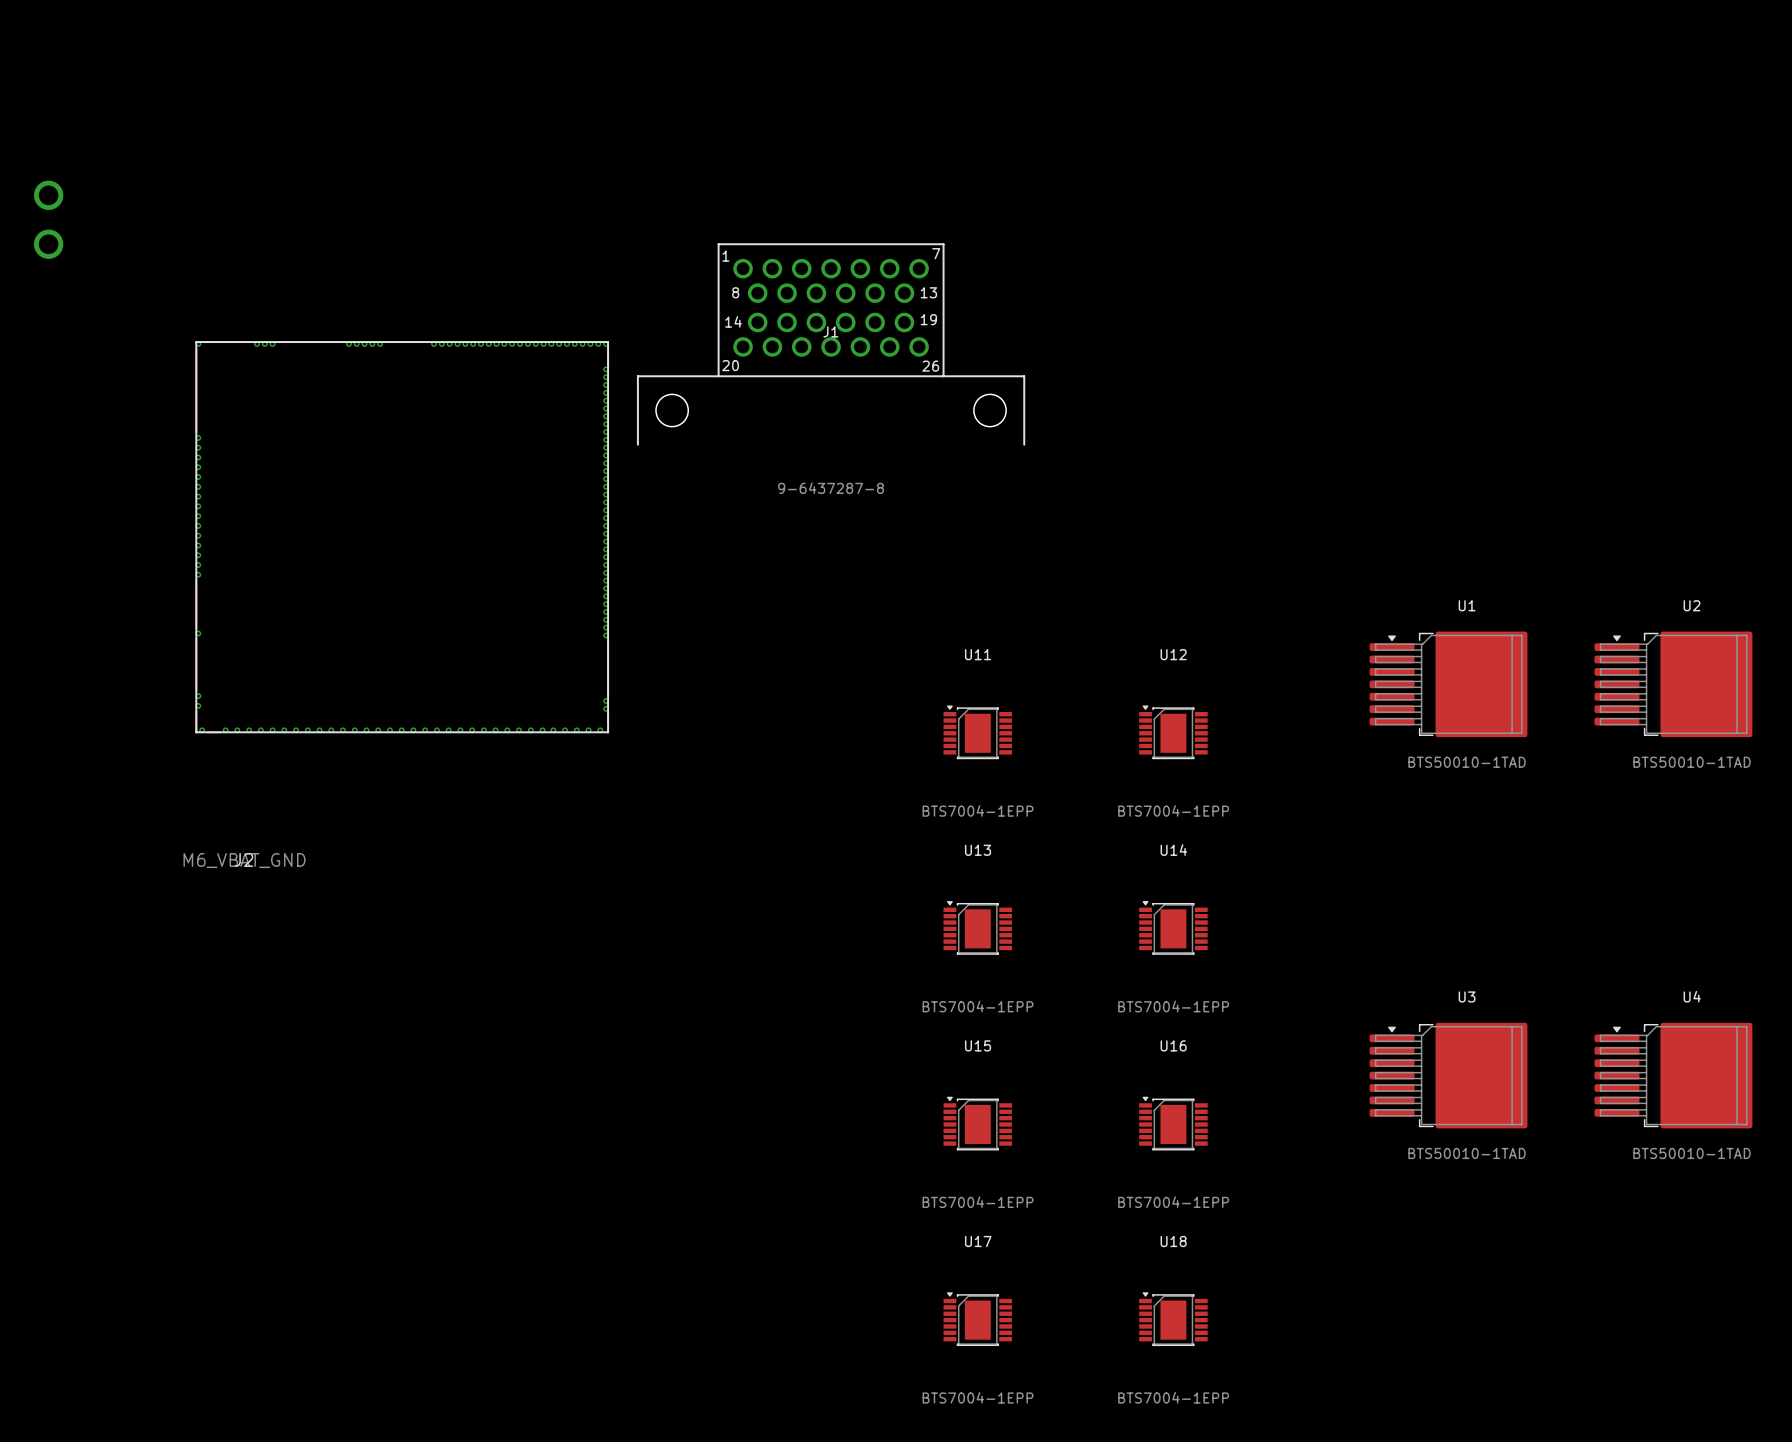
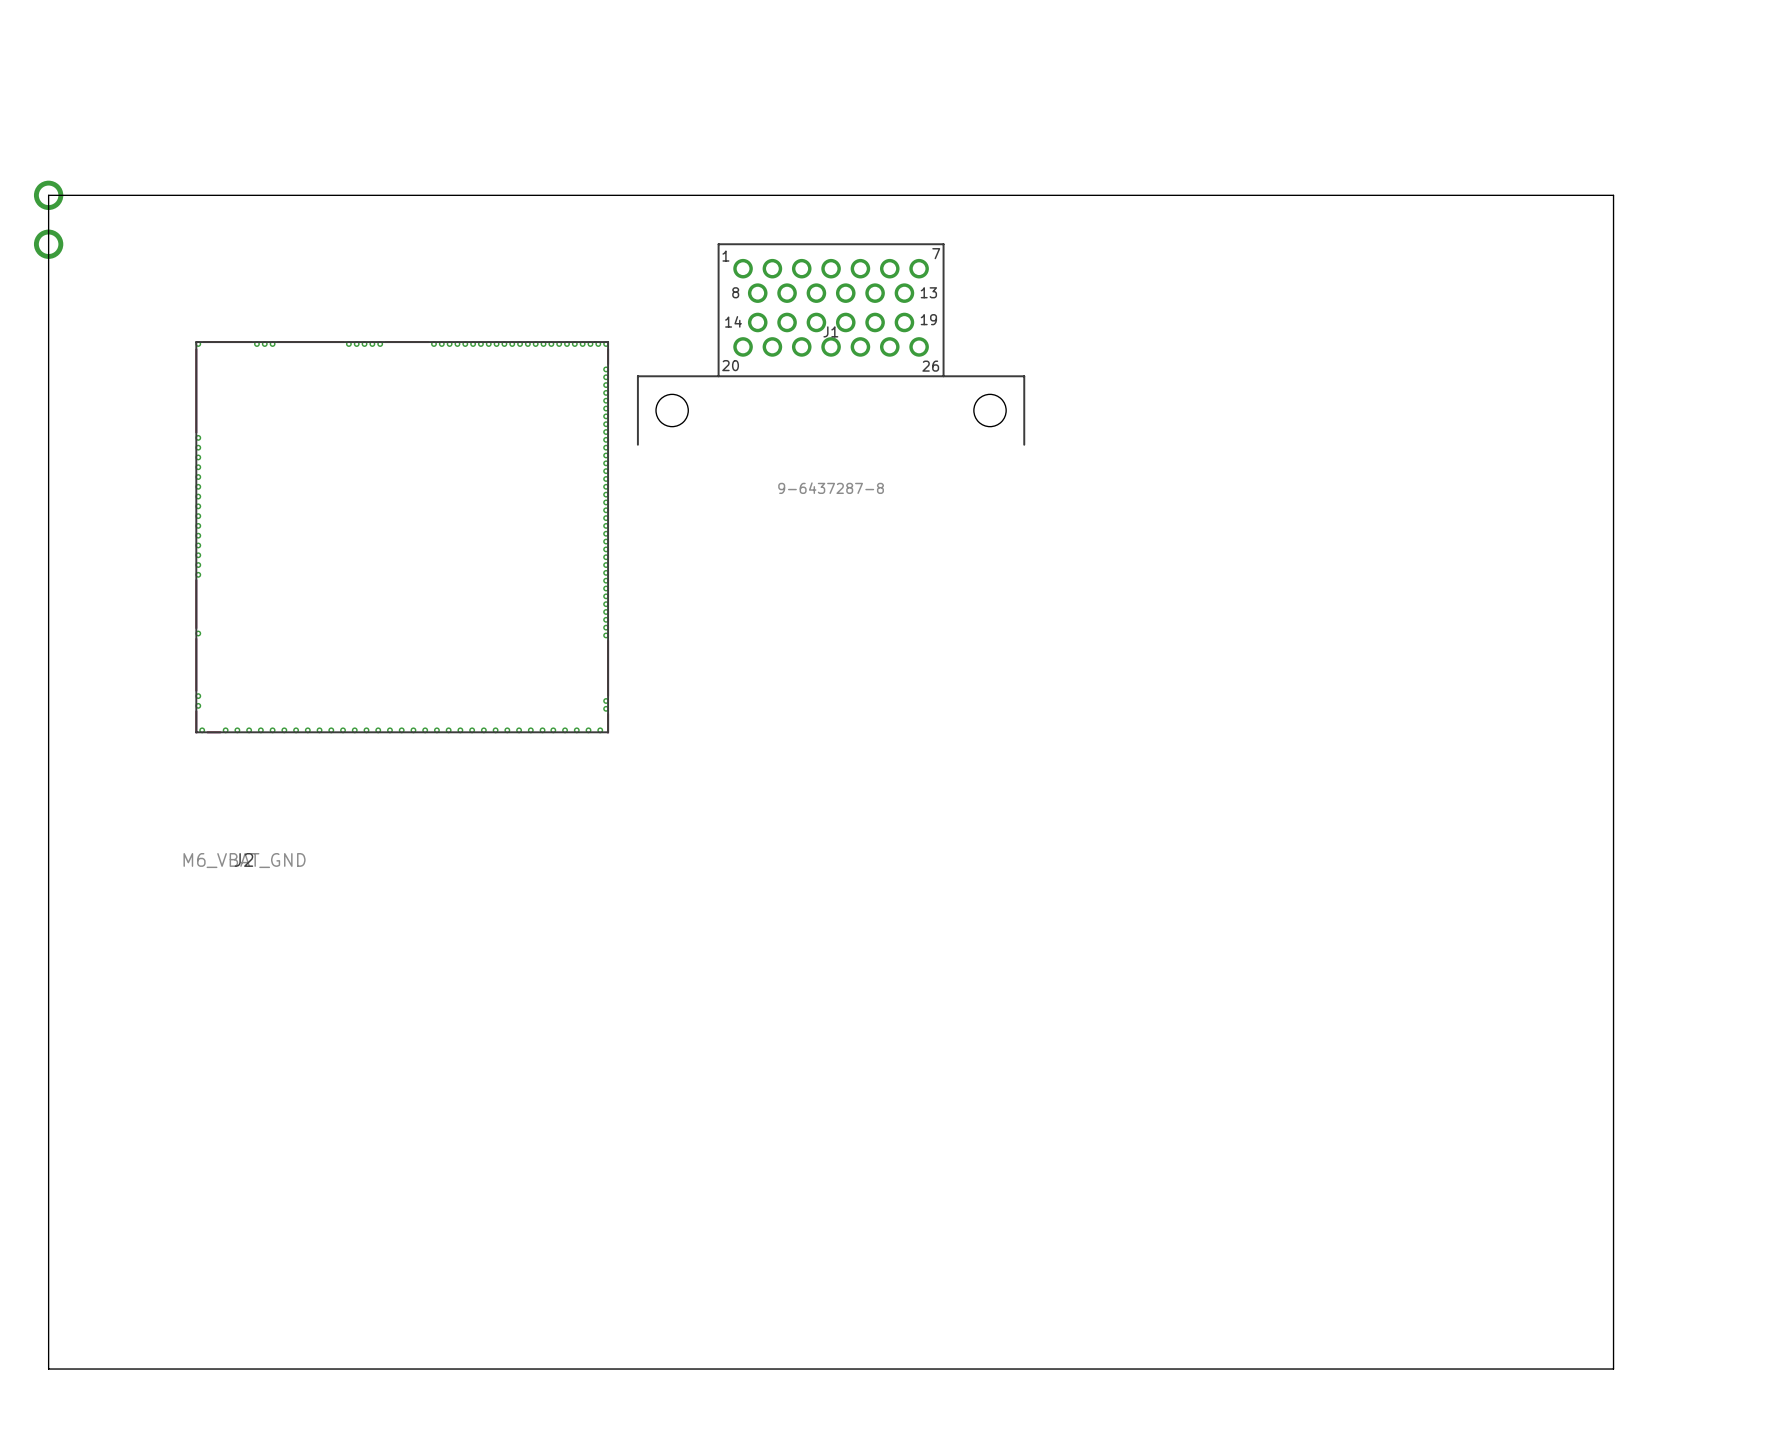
board edge: none -> (48, 195) (1613, 195) (1613, 1369) (48, 1369) (48, 195)
U1: BTS50010-1TAD (1448, 684) -> none
U2: BTS50010-1TAD (1673, 684) -> none
U11: BTS7004-1EPP (977, 732) -> none
U12: BTS7004-1EPP (1173, 732) -> none
U13: BTS7004-1EPP (977, 927) -> none
U14: BTS7004-1EPP (1173, 927) -> none
U3: BTS50010-1TAD (1448, 1075) -> none
U4: BTS50010-1TAD (1673, 1075) -> none
U15: BTS7004-1EPP (977, 1123) -> none
U16: BTS7004-1EPP (1173, 1123) -> none
U17: BTS7004-1EPP (977, 1319) -> none
U18: BTS7004-1EPP (1173, 1319) -> none

